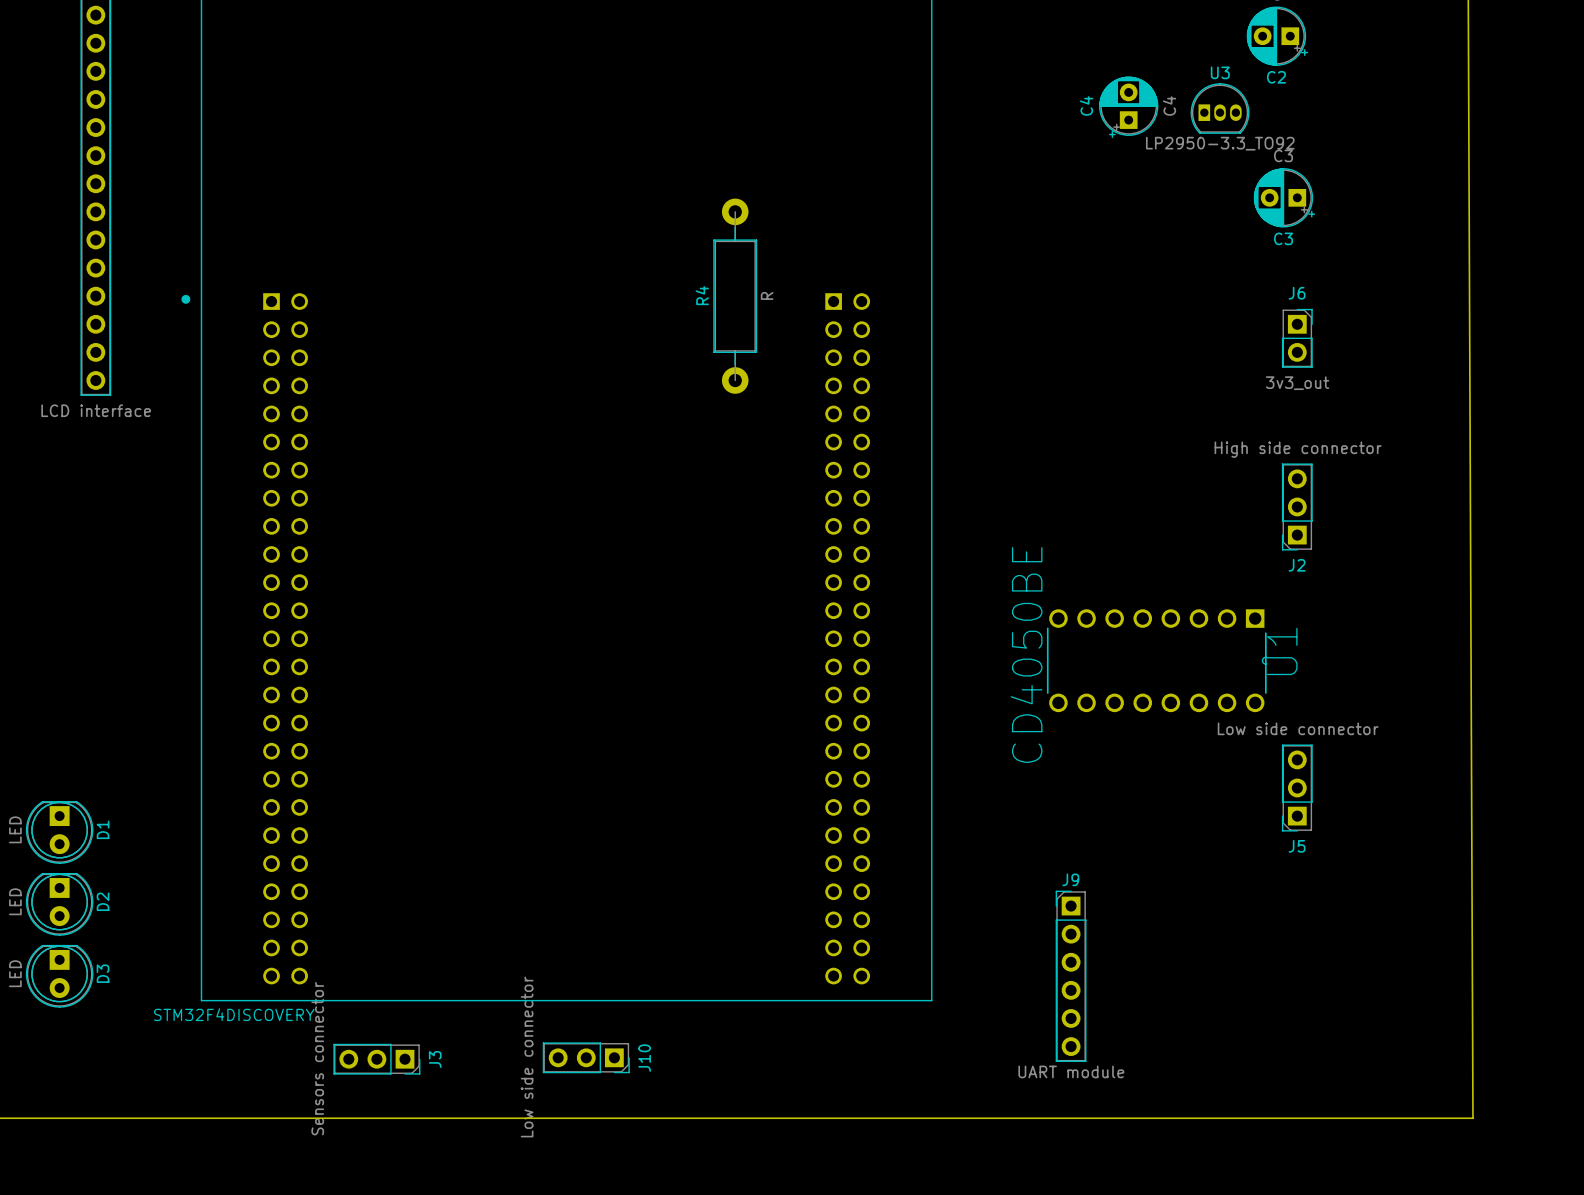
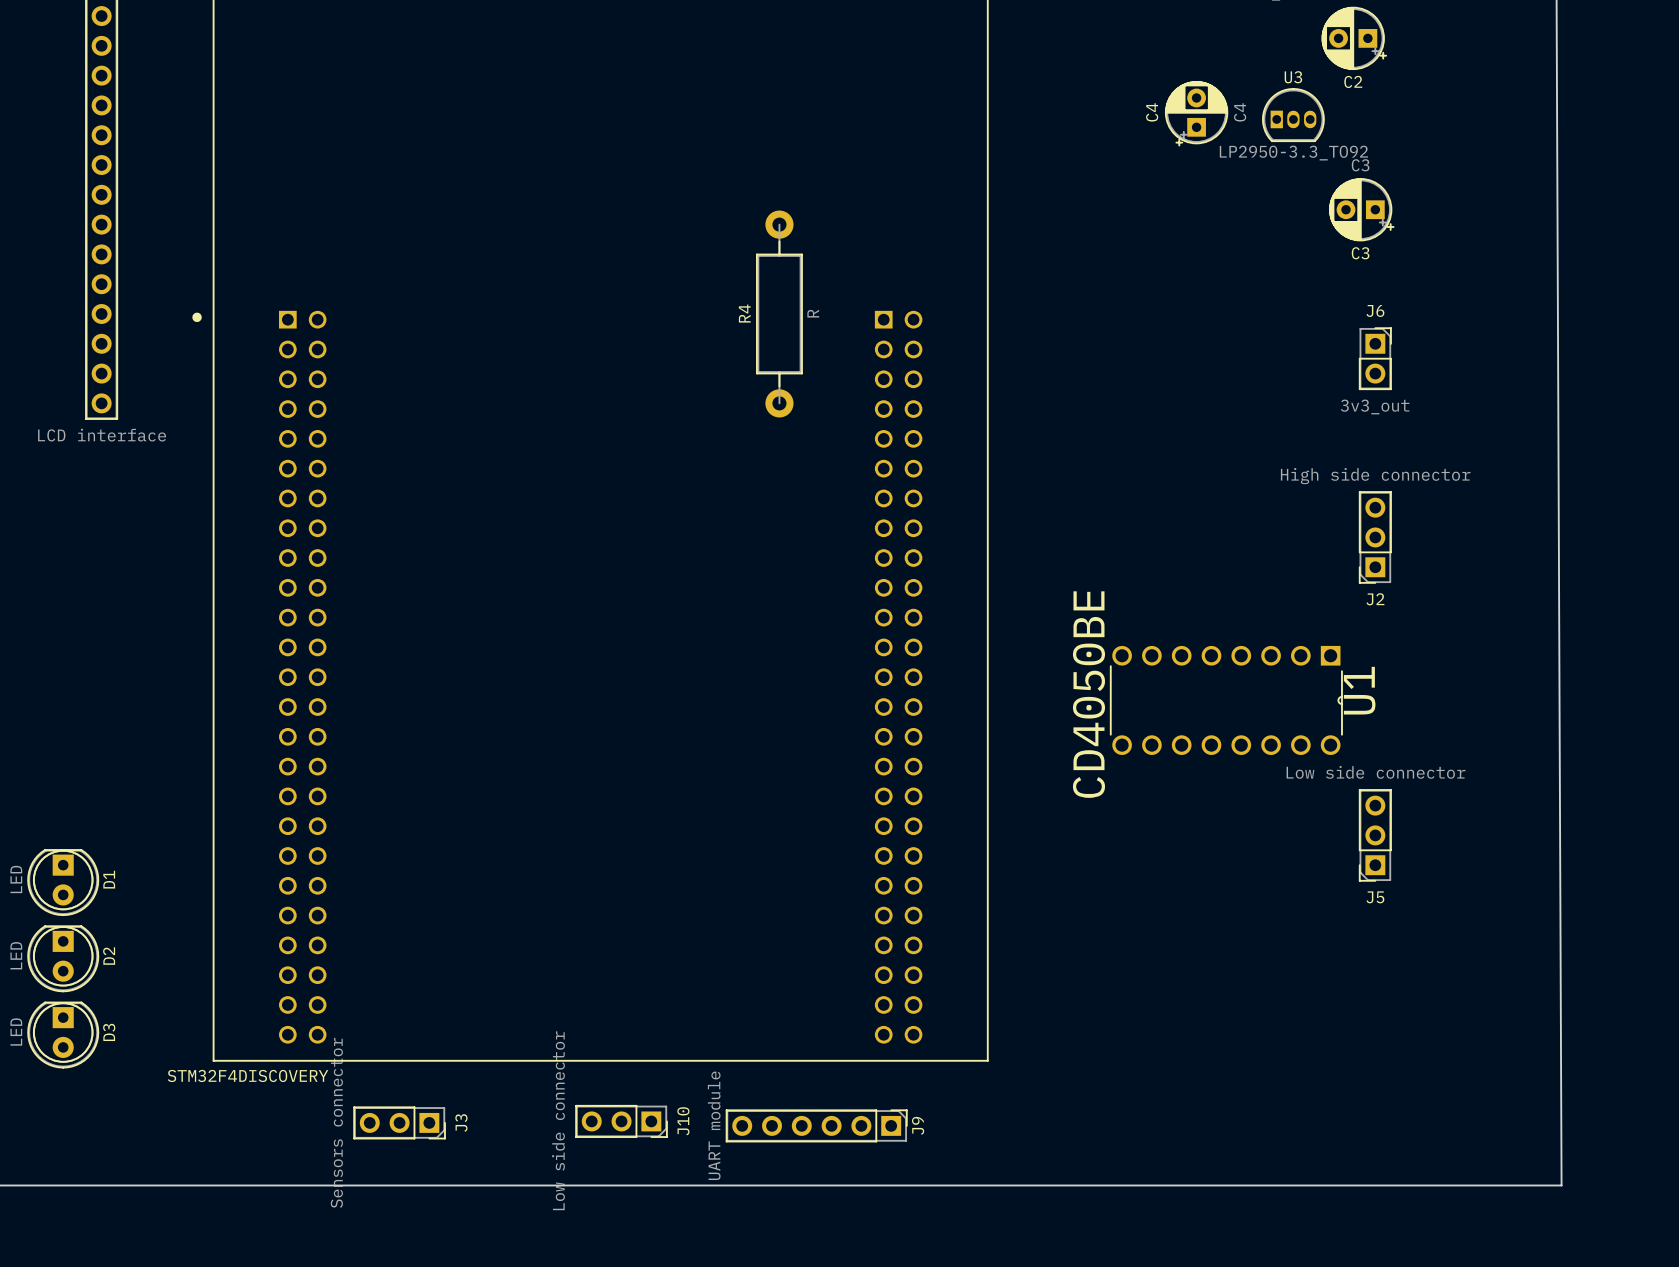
J9 rotation: 0° (1071, 976) -> 90° clockwise (816, 1125)
J9 position: (1071, 976) -> (816, 1125)

